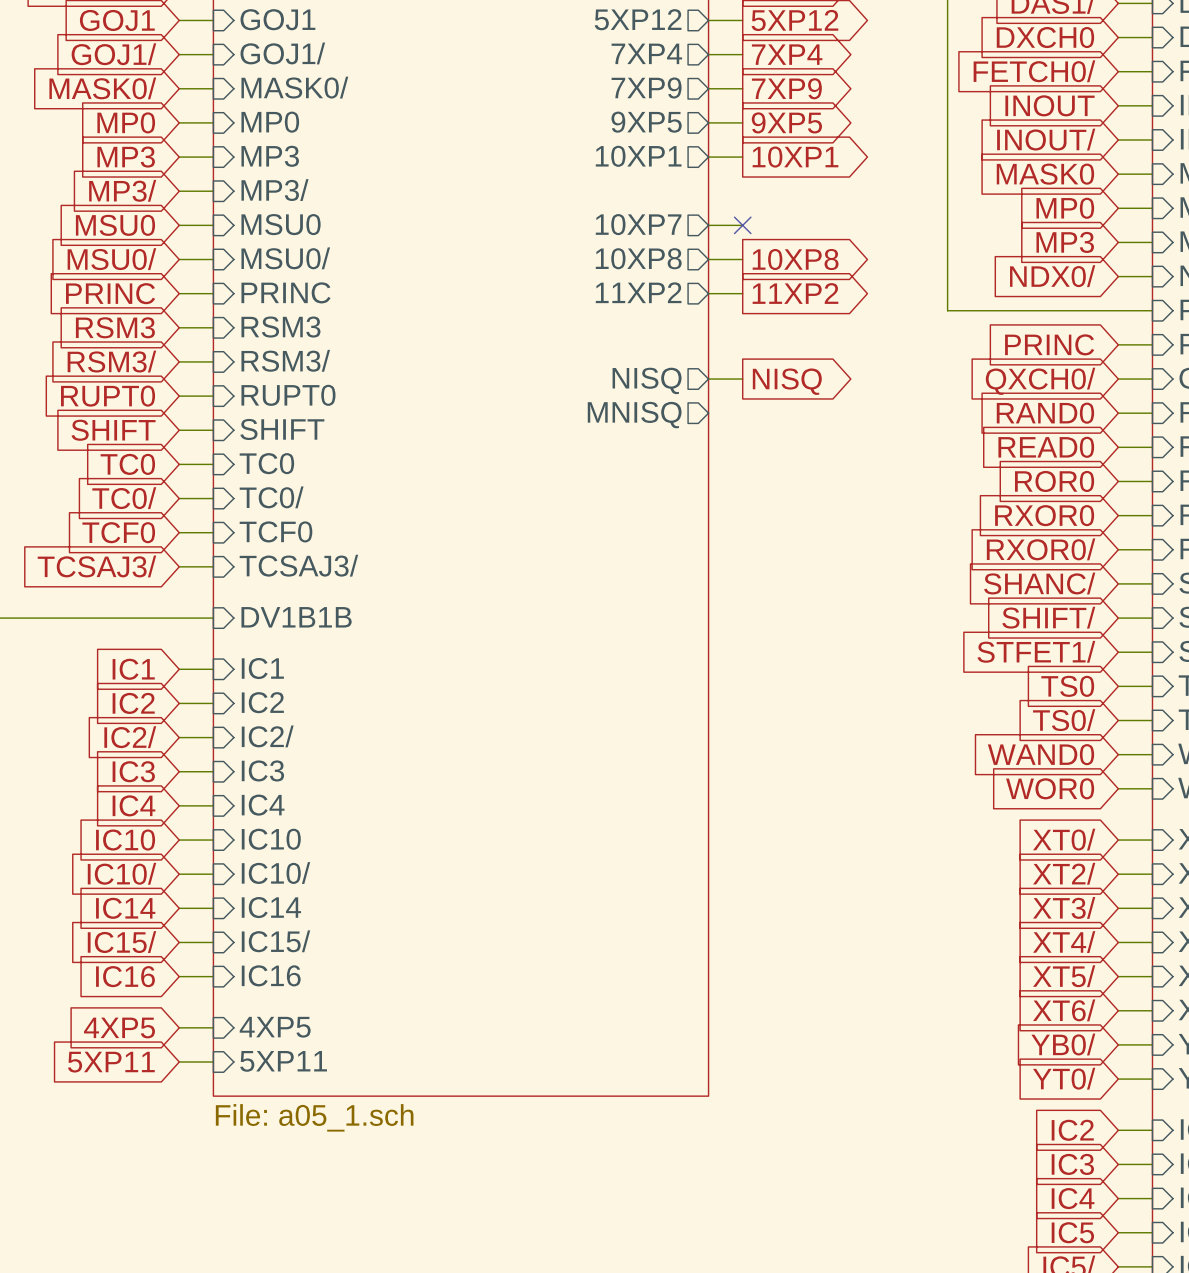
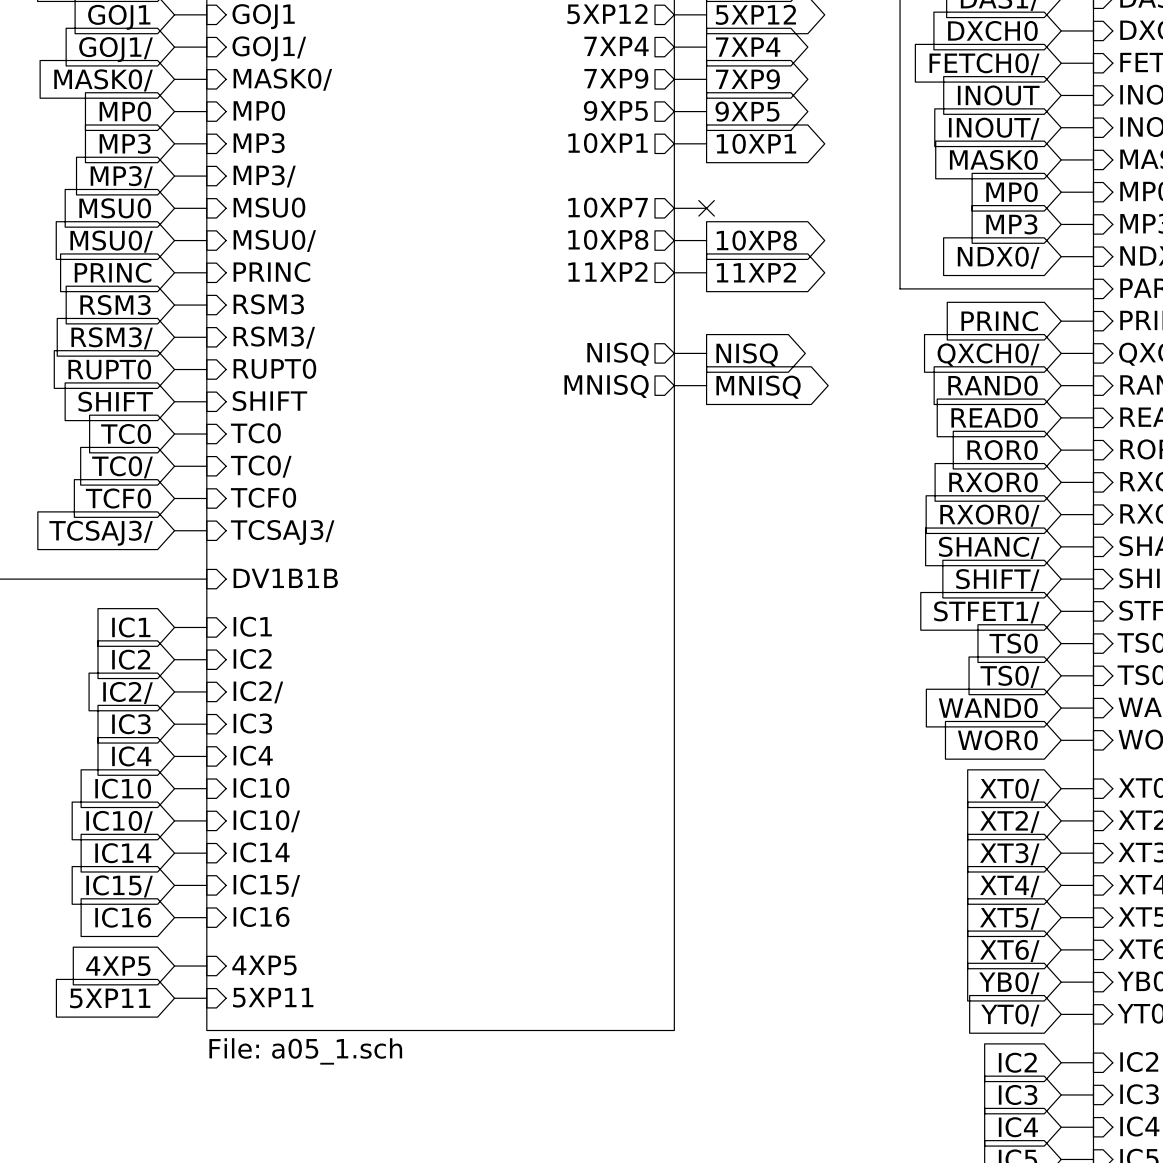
wire: none -> (674, 385) (706, 385)
global label: none -> MNISQ (758, 387)

